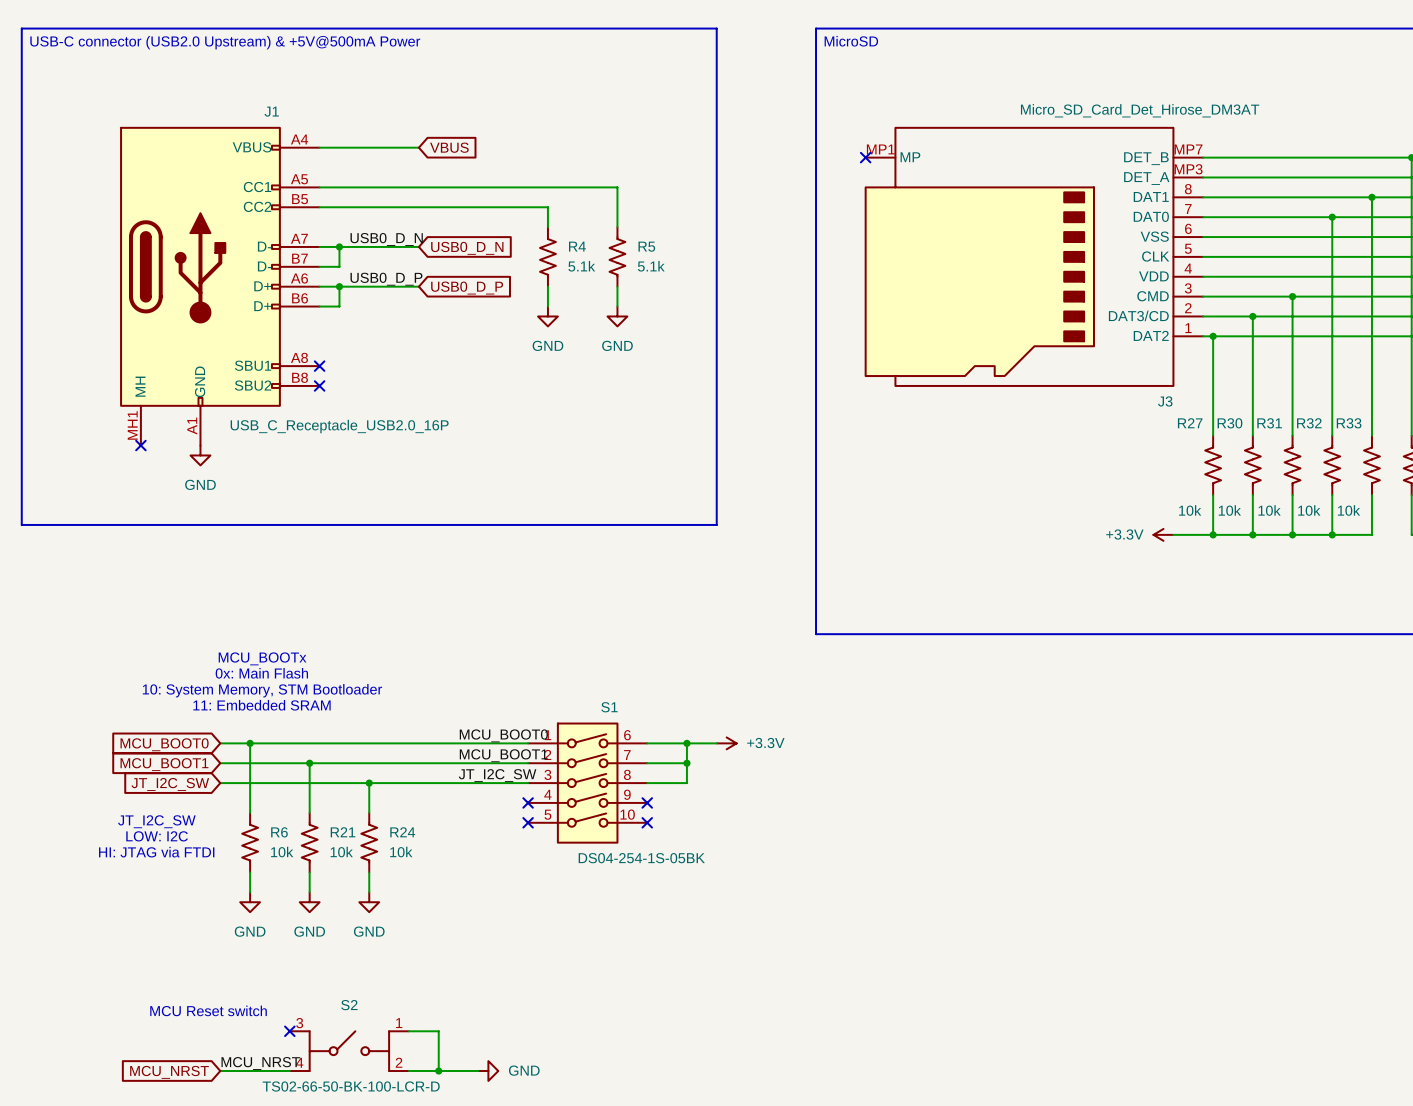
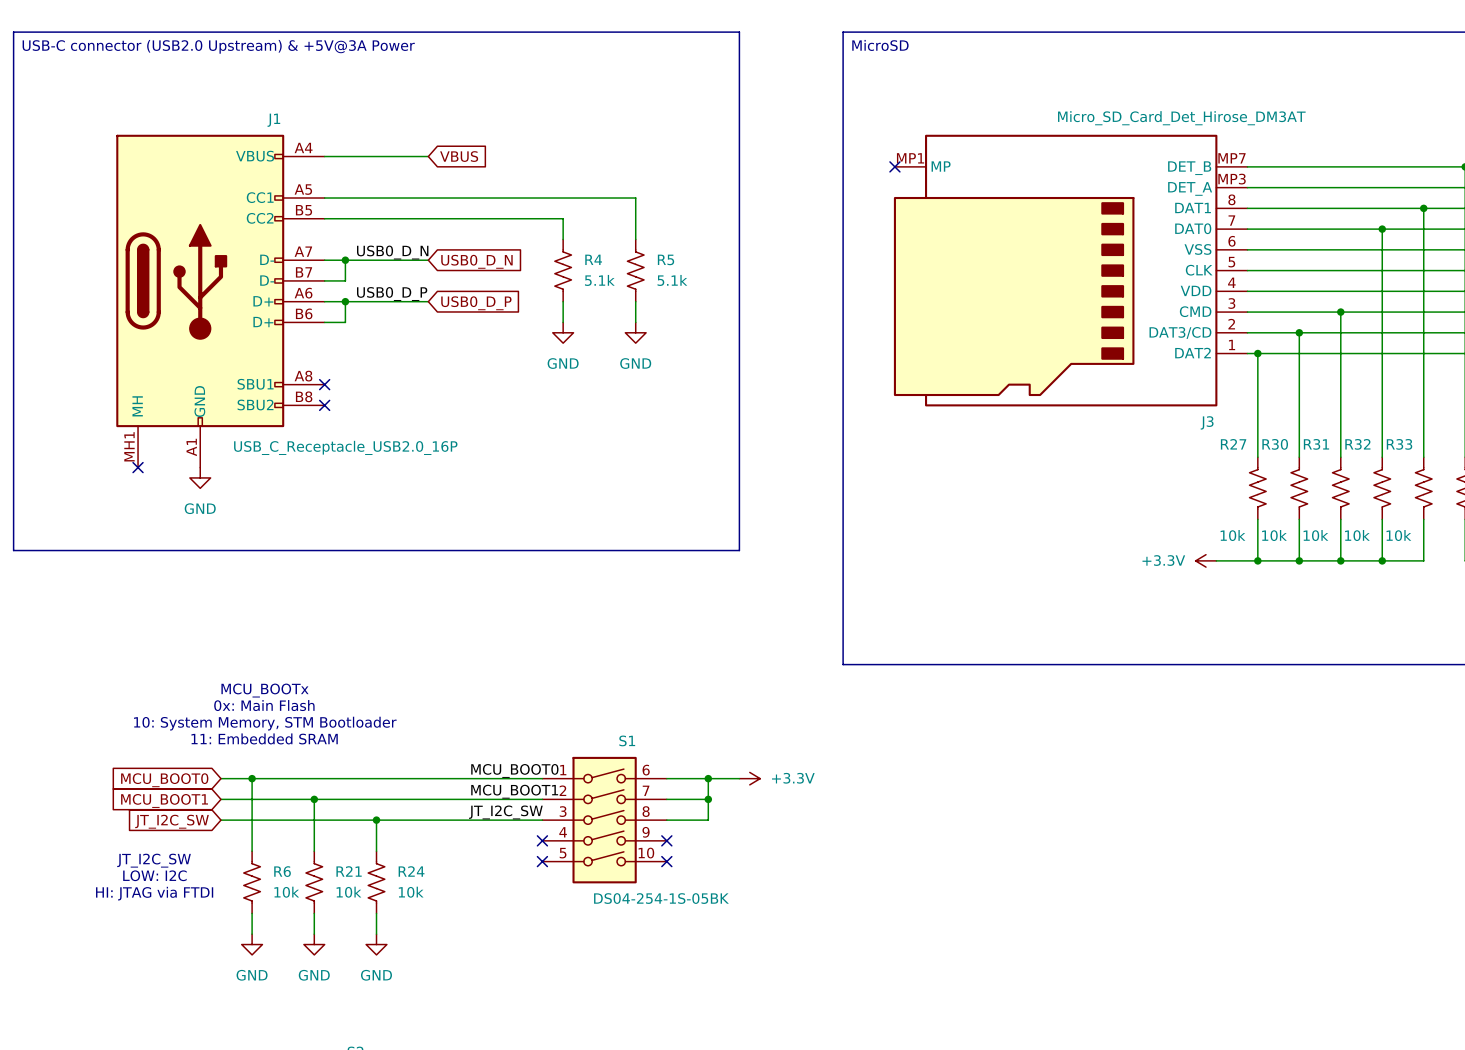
text: USB-C connector (USB2.0 Upstream) & +5V@500mA Power (225, 42) -> USB-C connector (USB2.0 Upstream) & +5V@3A Power (218, 46)

